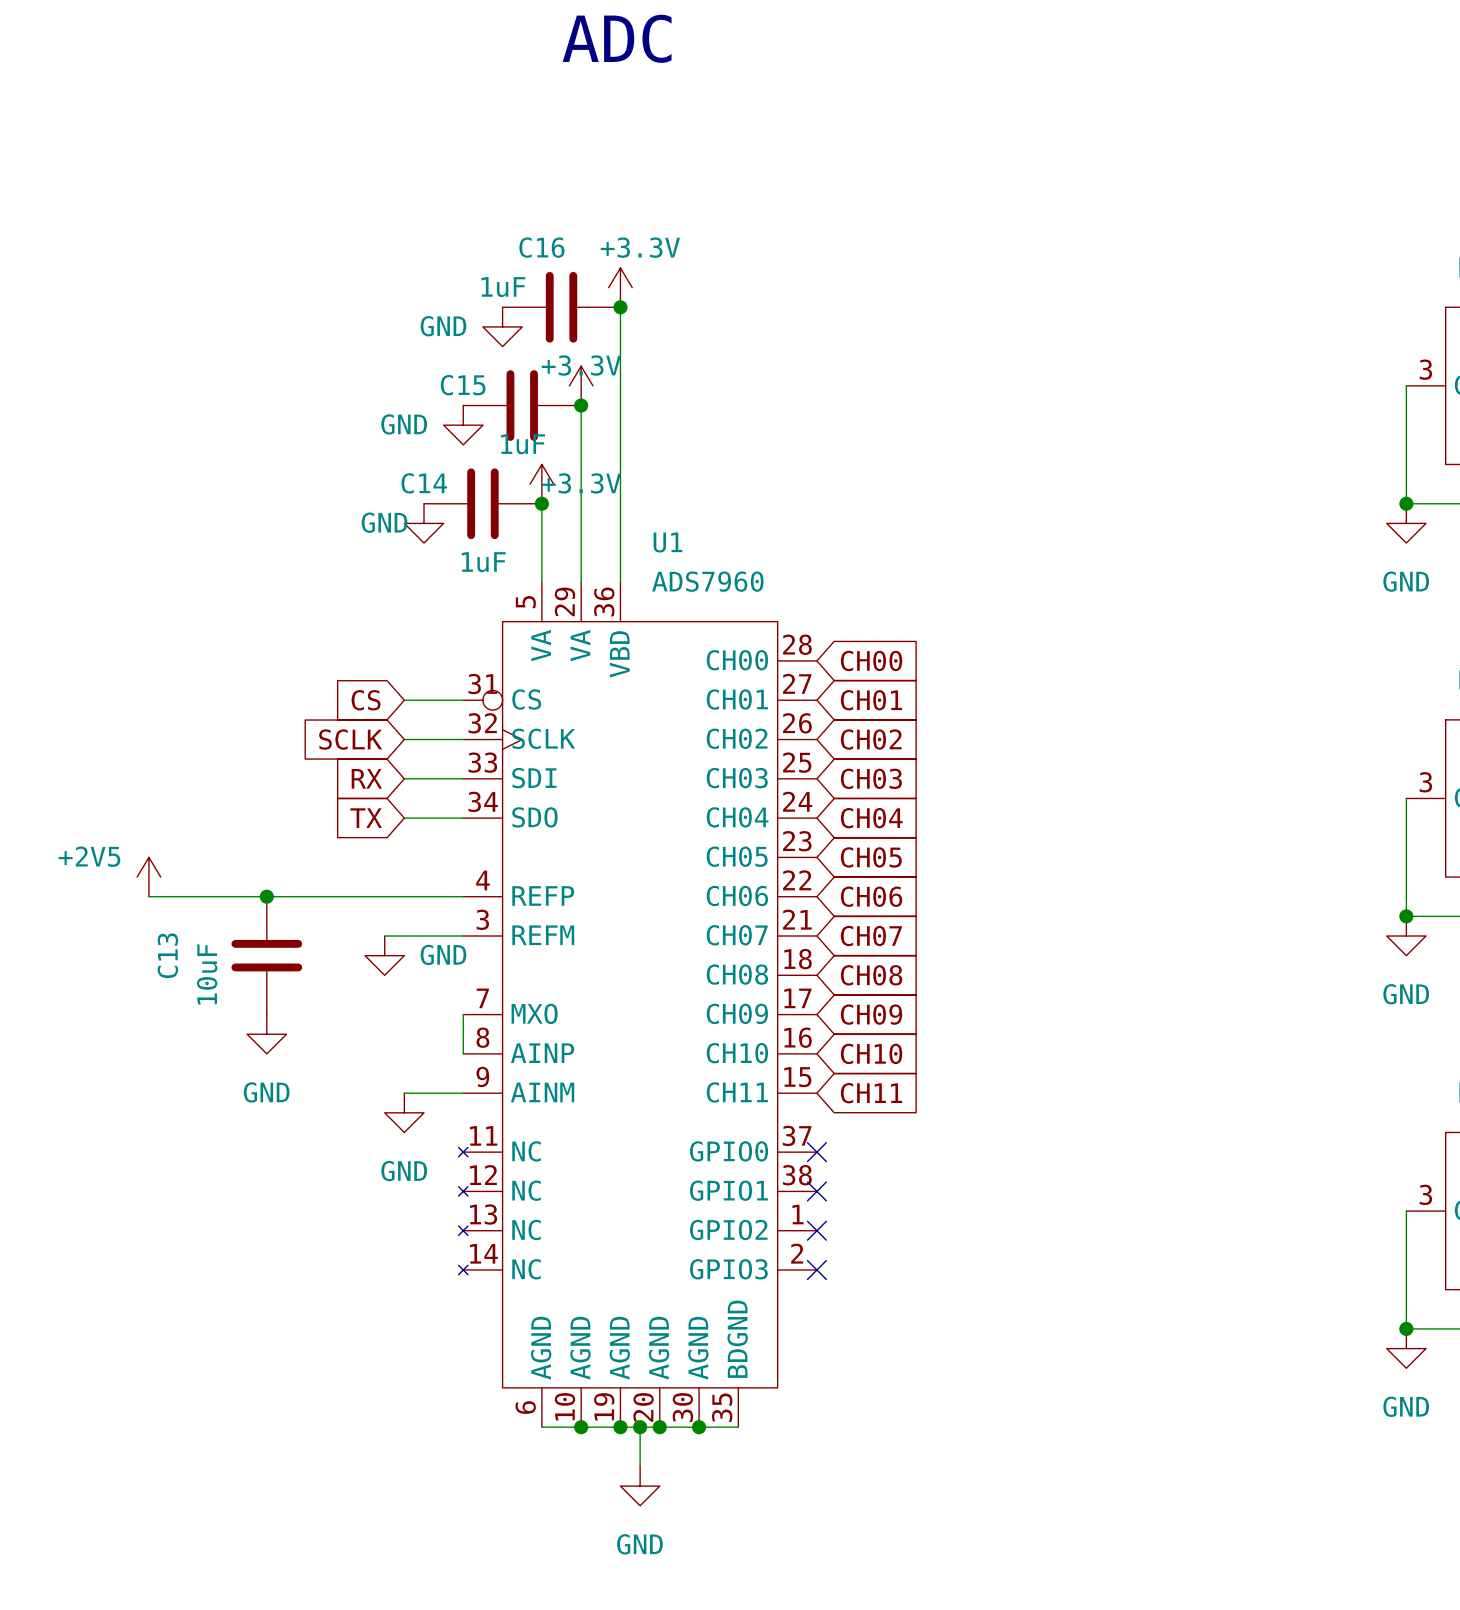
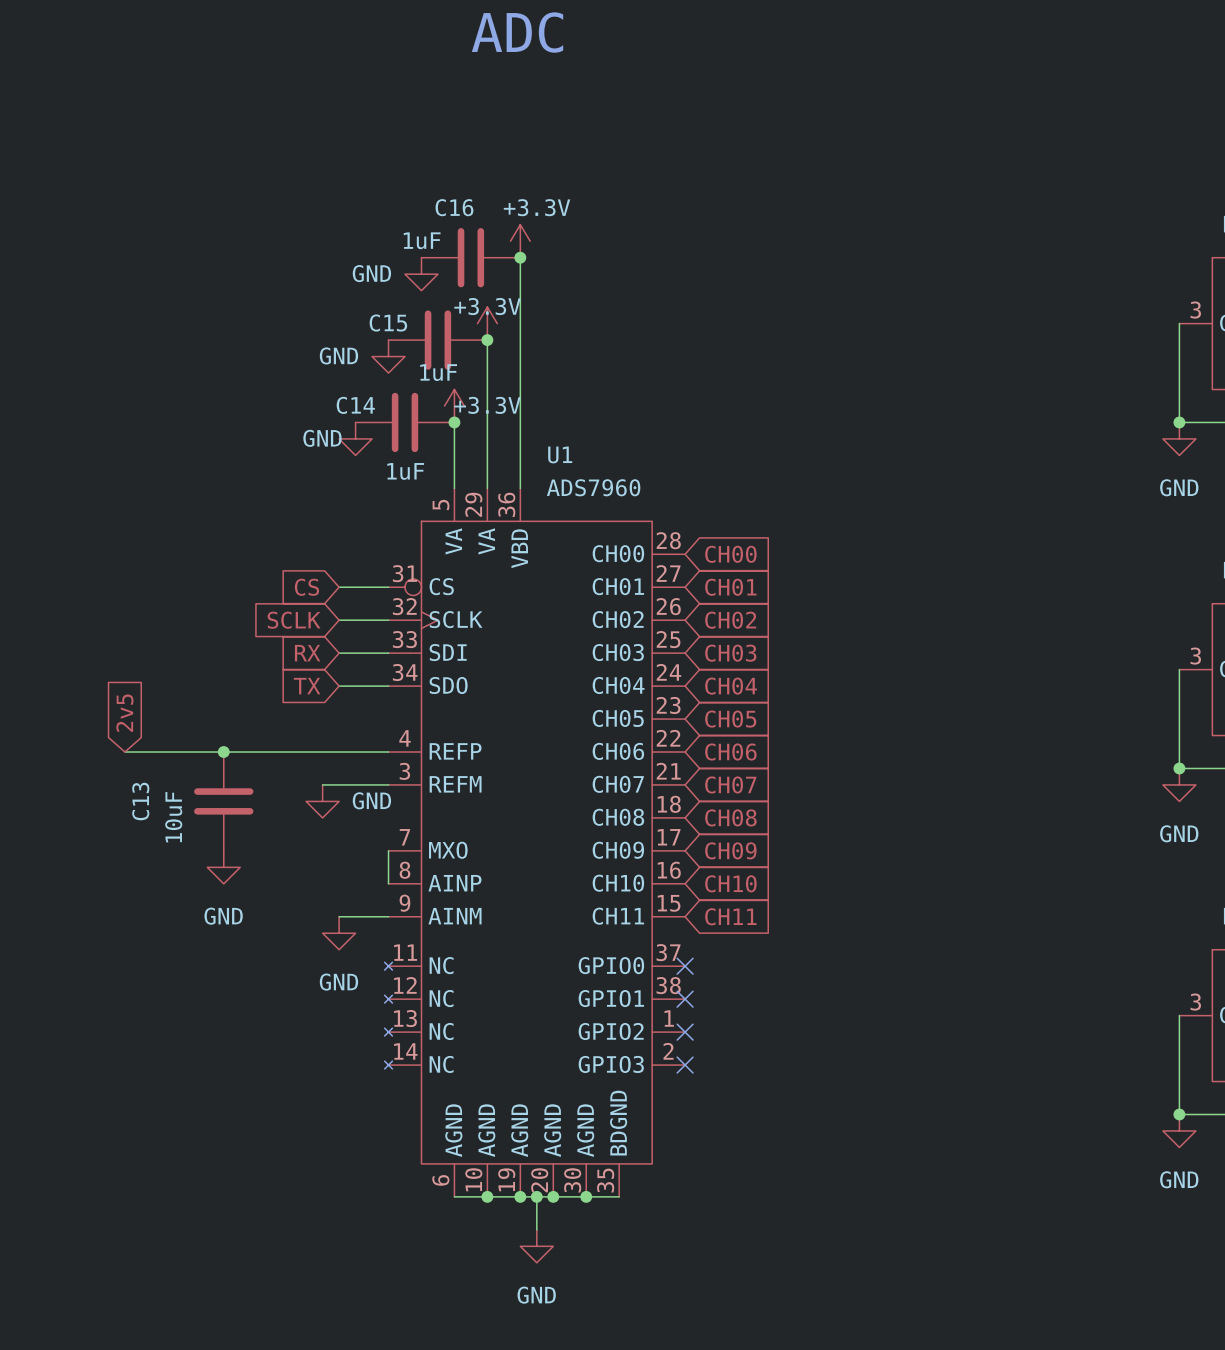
global label: none -> 2v5 (124, 713)
power symbol: +2V5 (148, 877) -> none

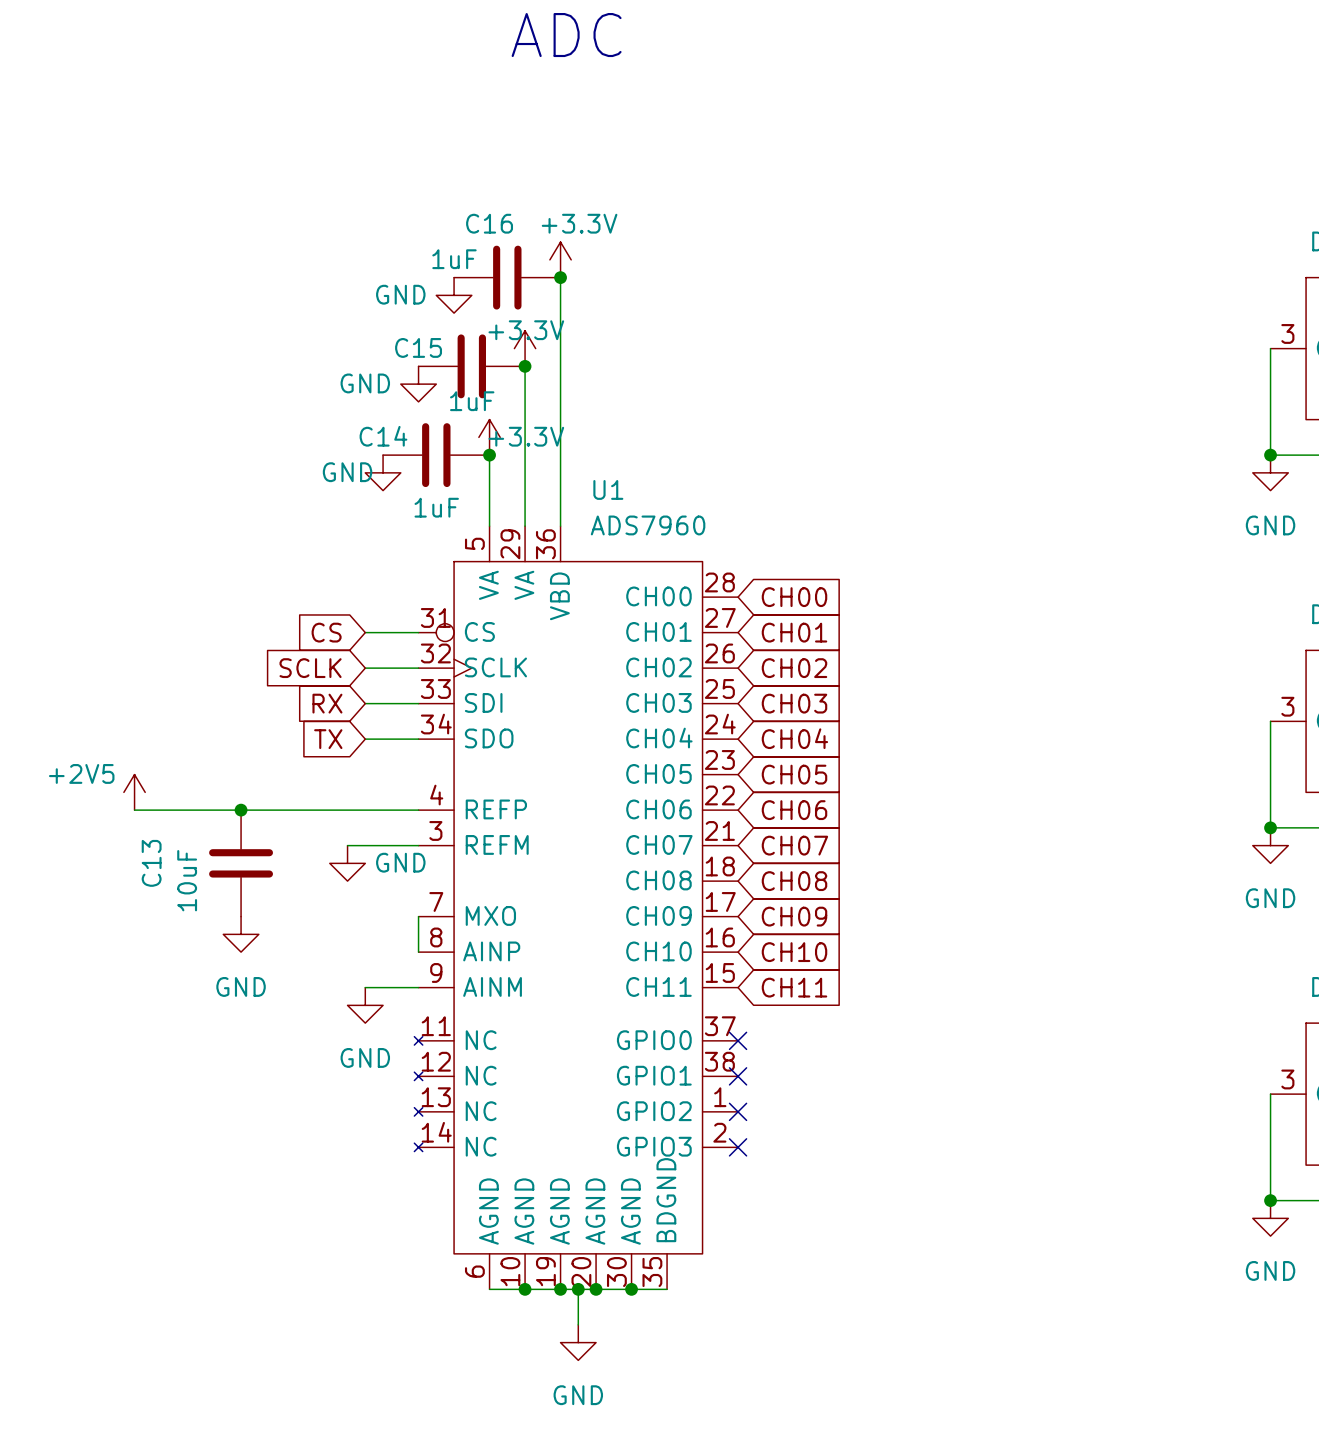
global label: 2v5 (124, 713) -> none
power symbol: none -> +2V5 (134, 792)

